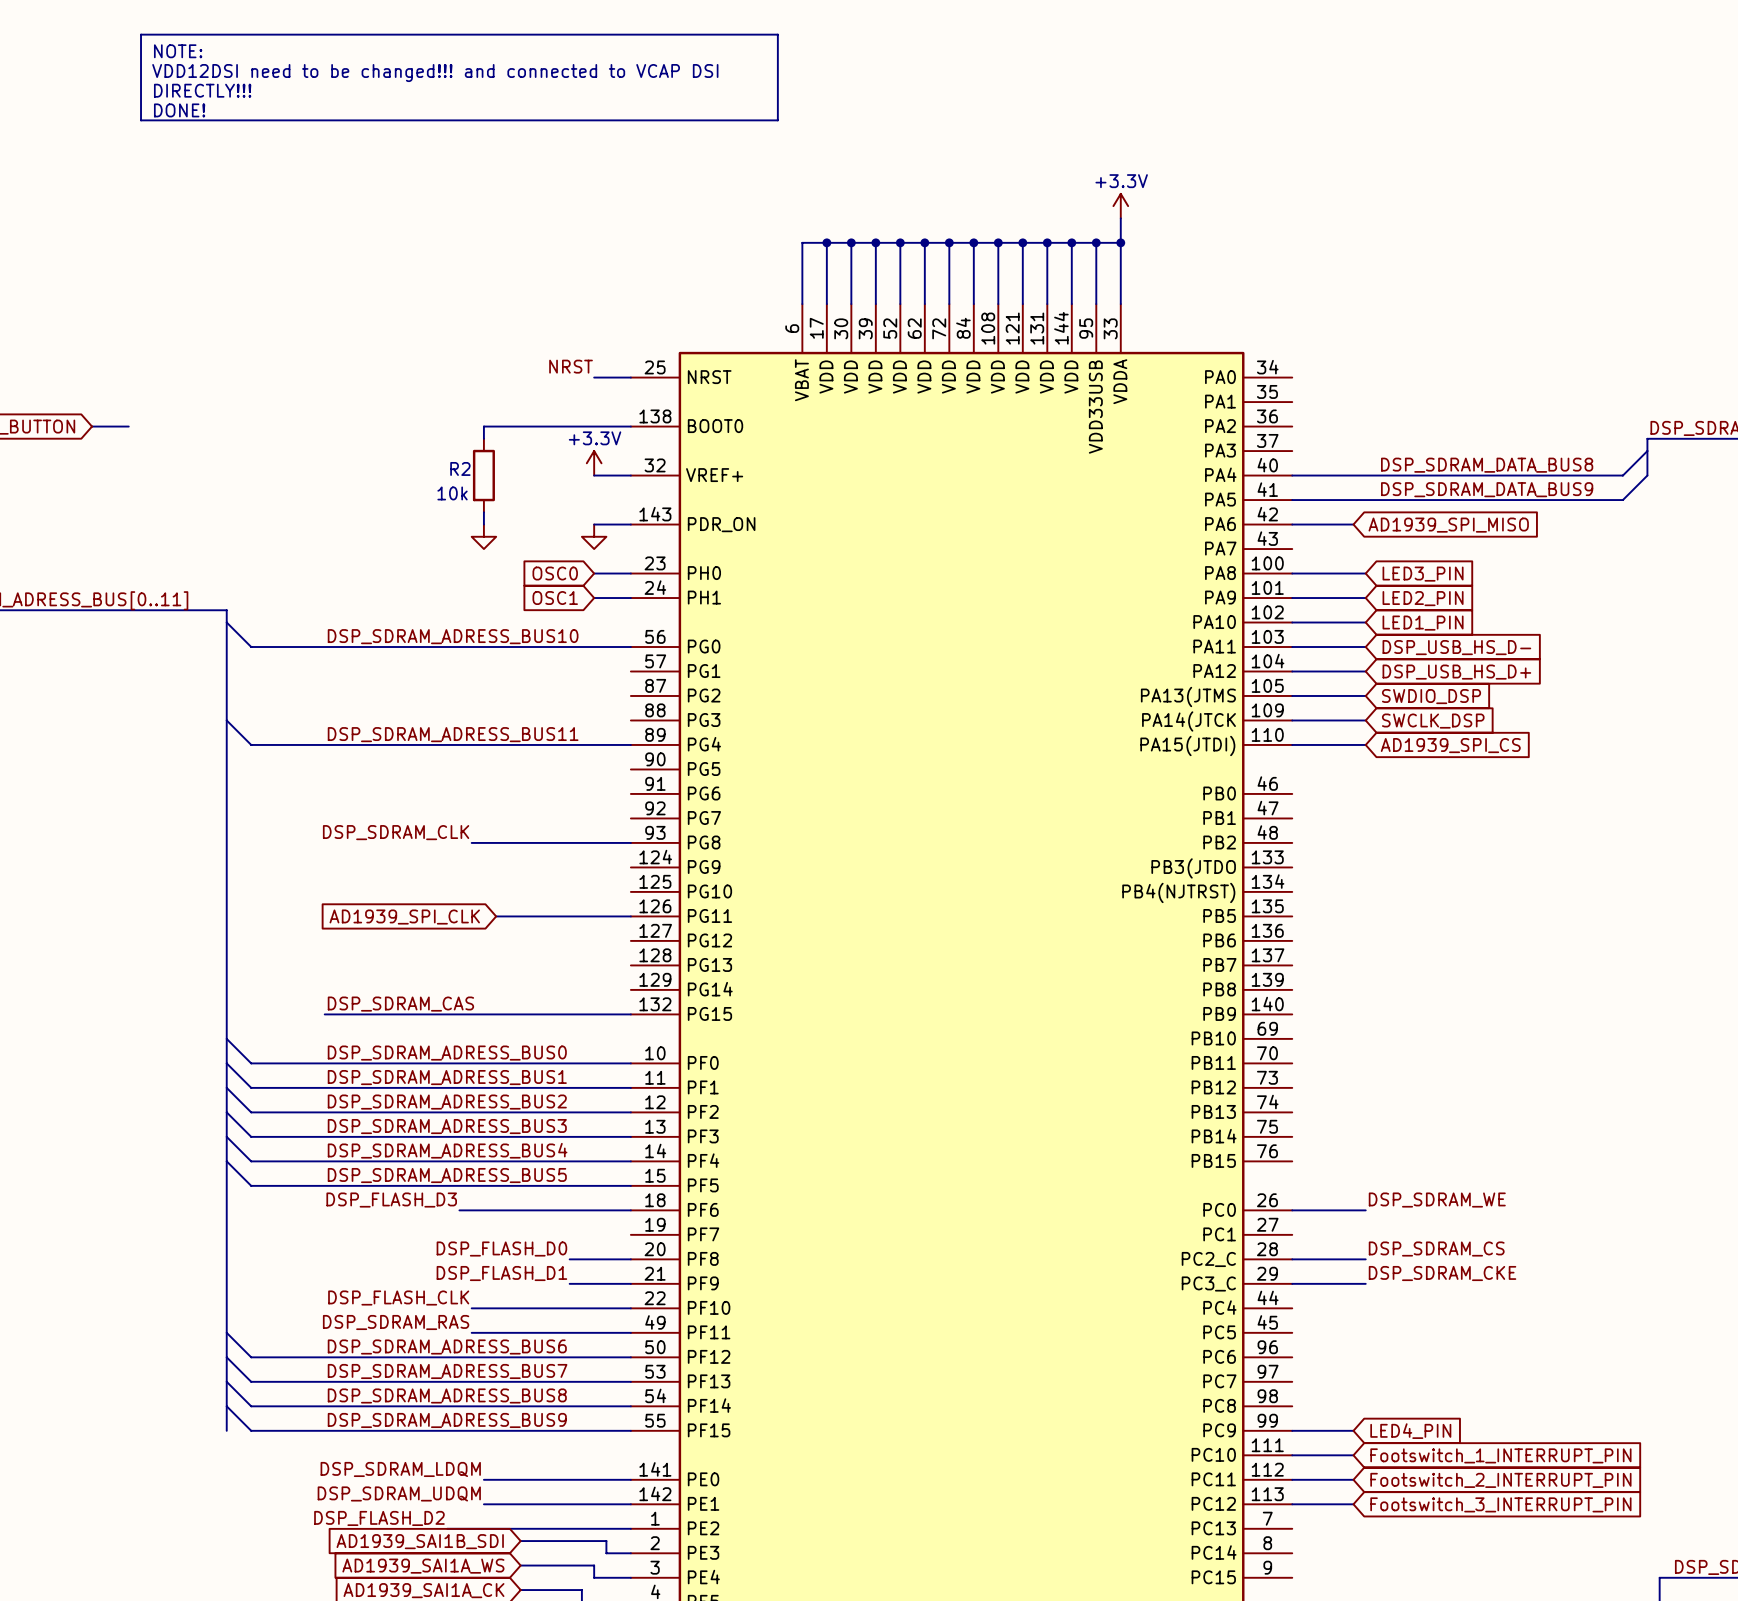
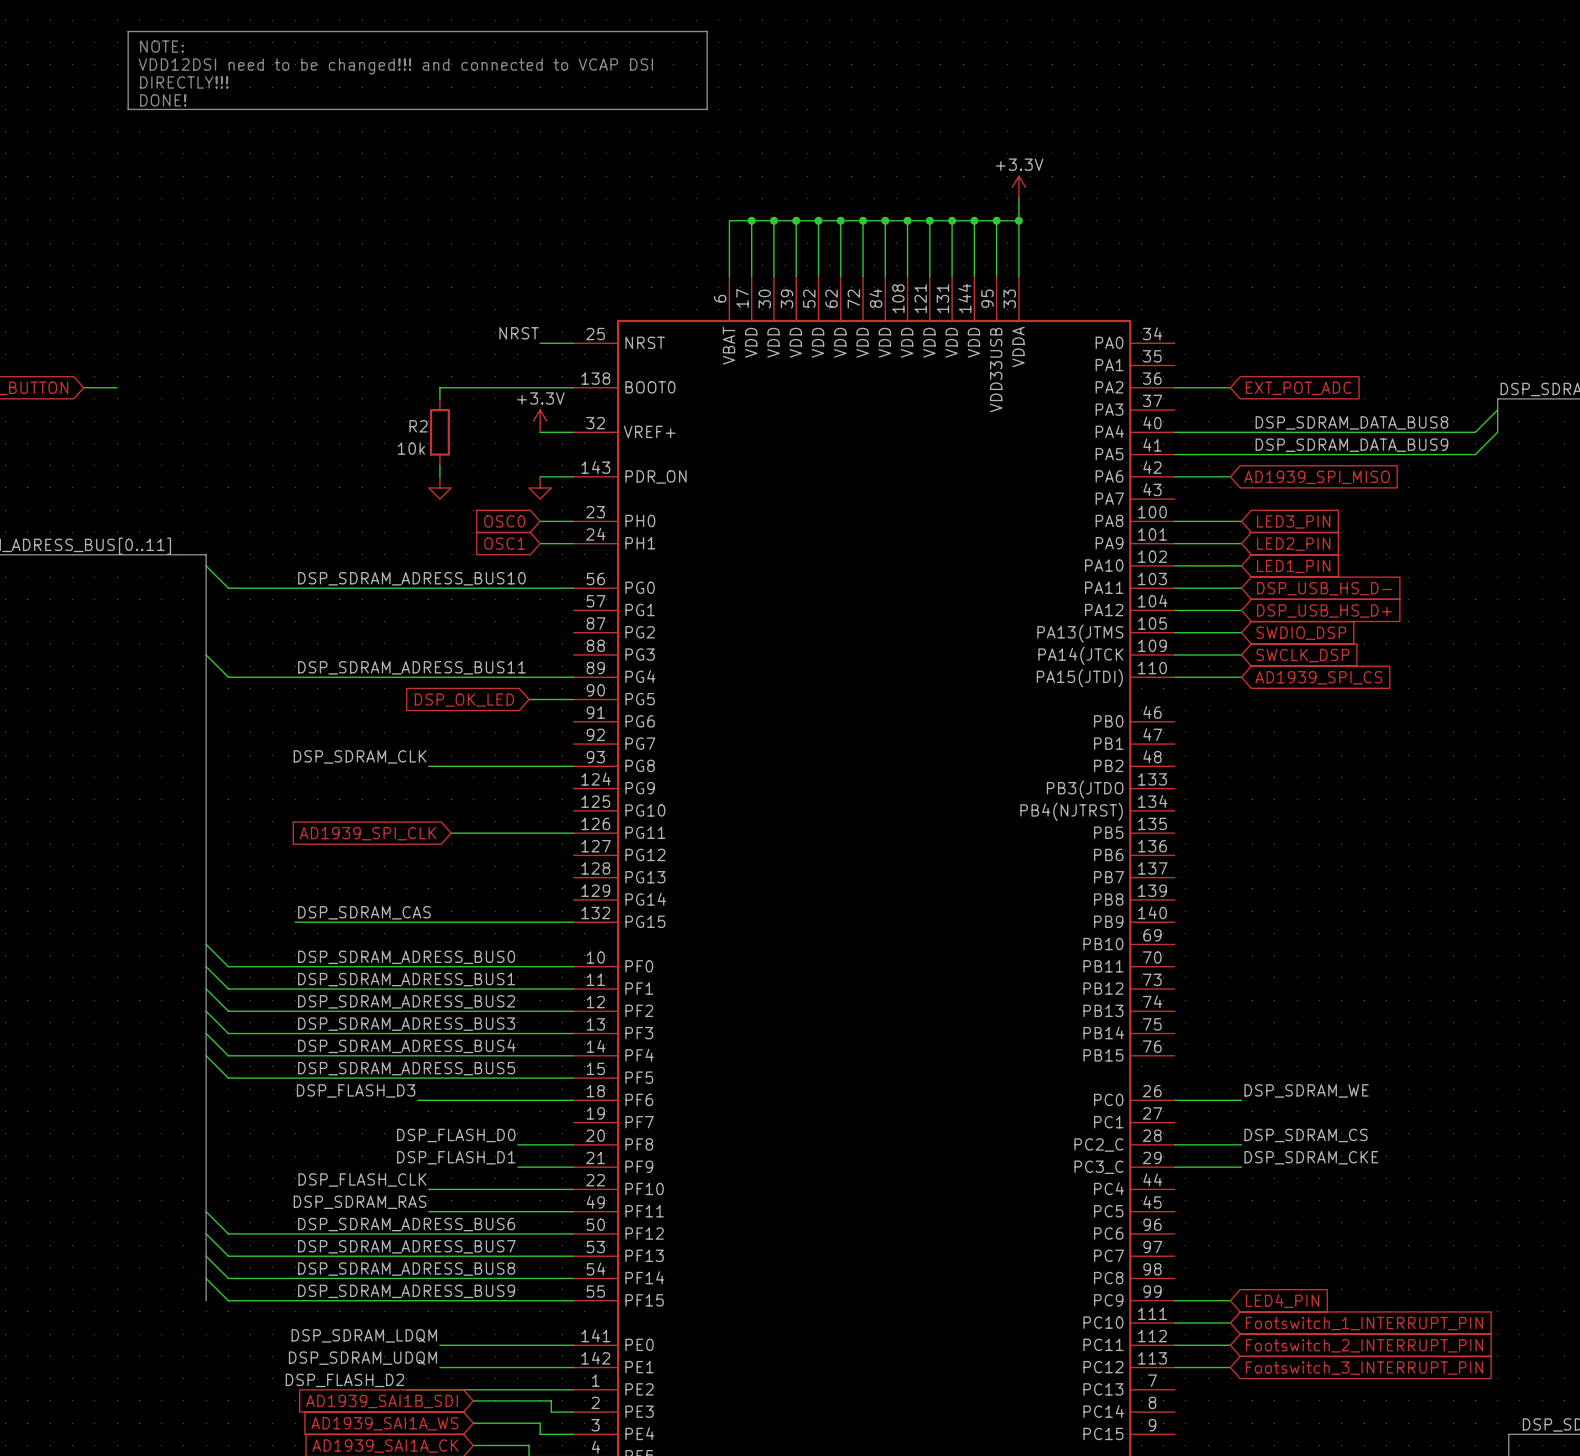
wire: none -> (1174, 387) (1230, 387)
global label: none -> EXT_POT_ADC (1298, 388)
wire: none -> (529, 699) (573, 699)
global label: none -> DSP_OK_LED (464, 700)

